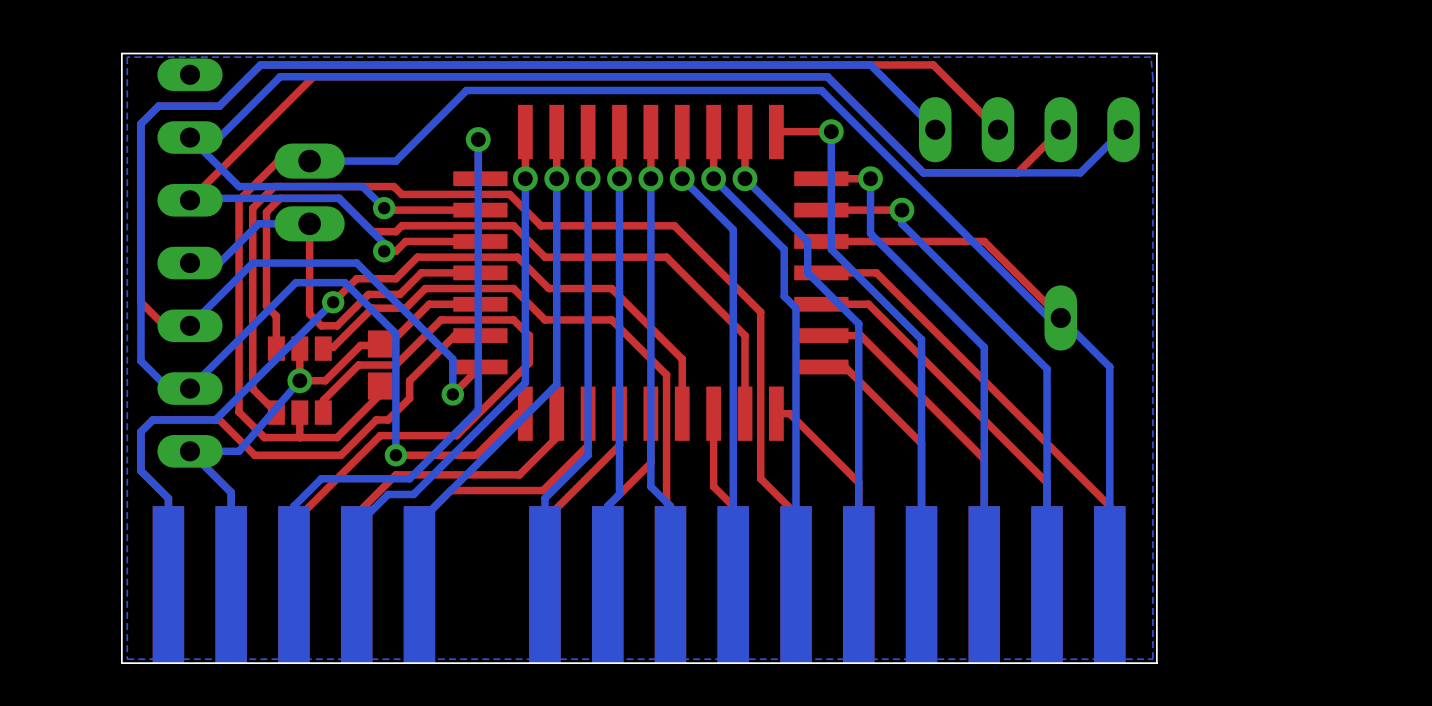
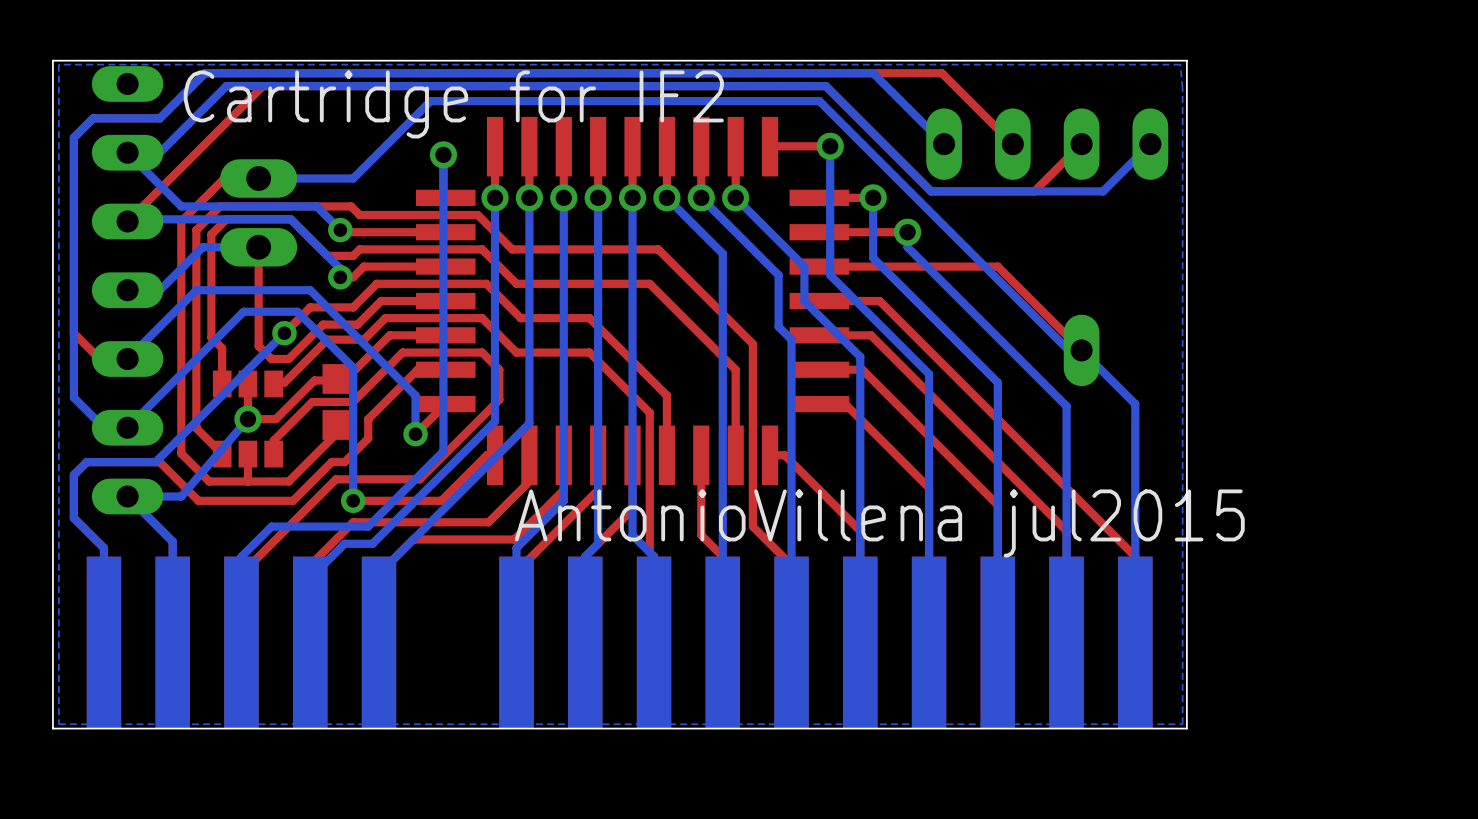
text: none -> Cartridge for IF2 (453, 104)
text: none -> AntonioVillena jul2015 (879, 523)

